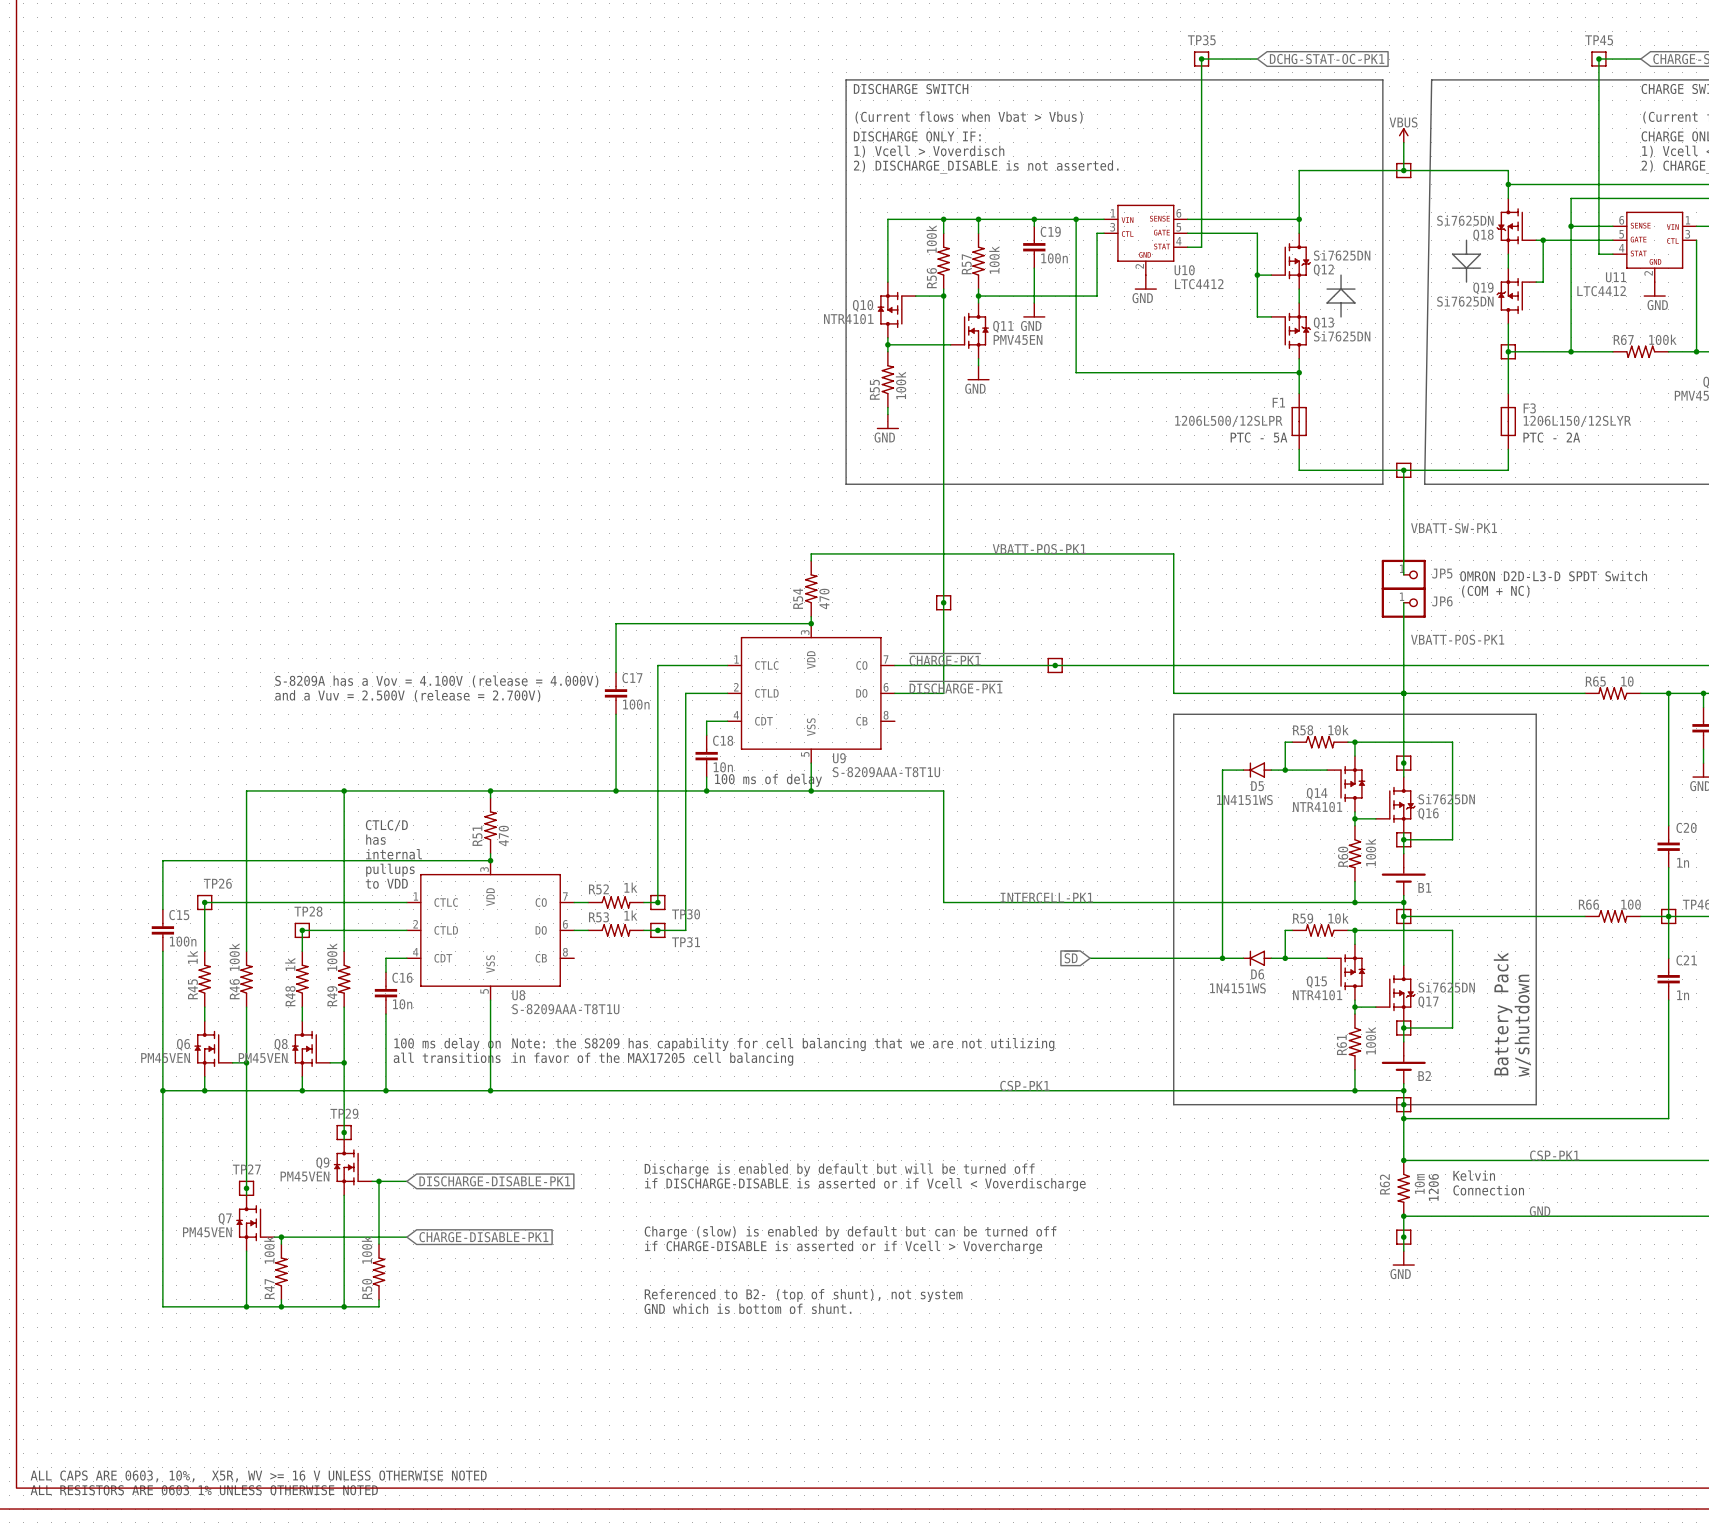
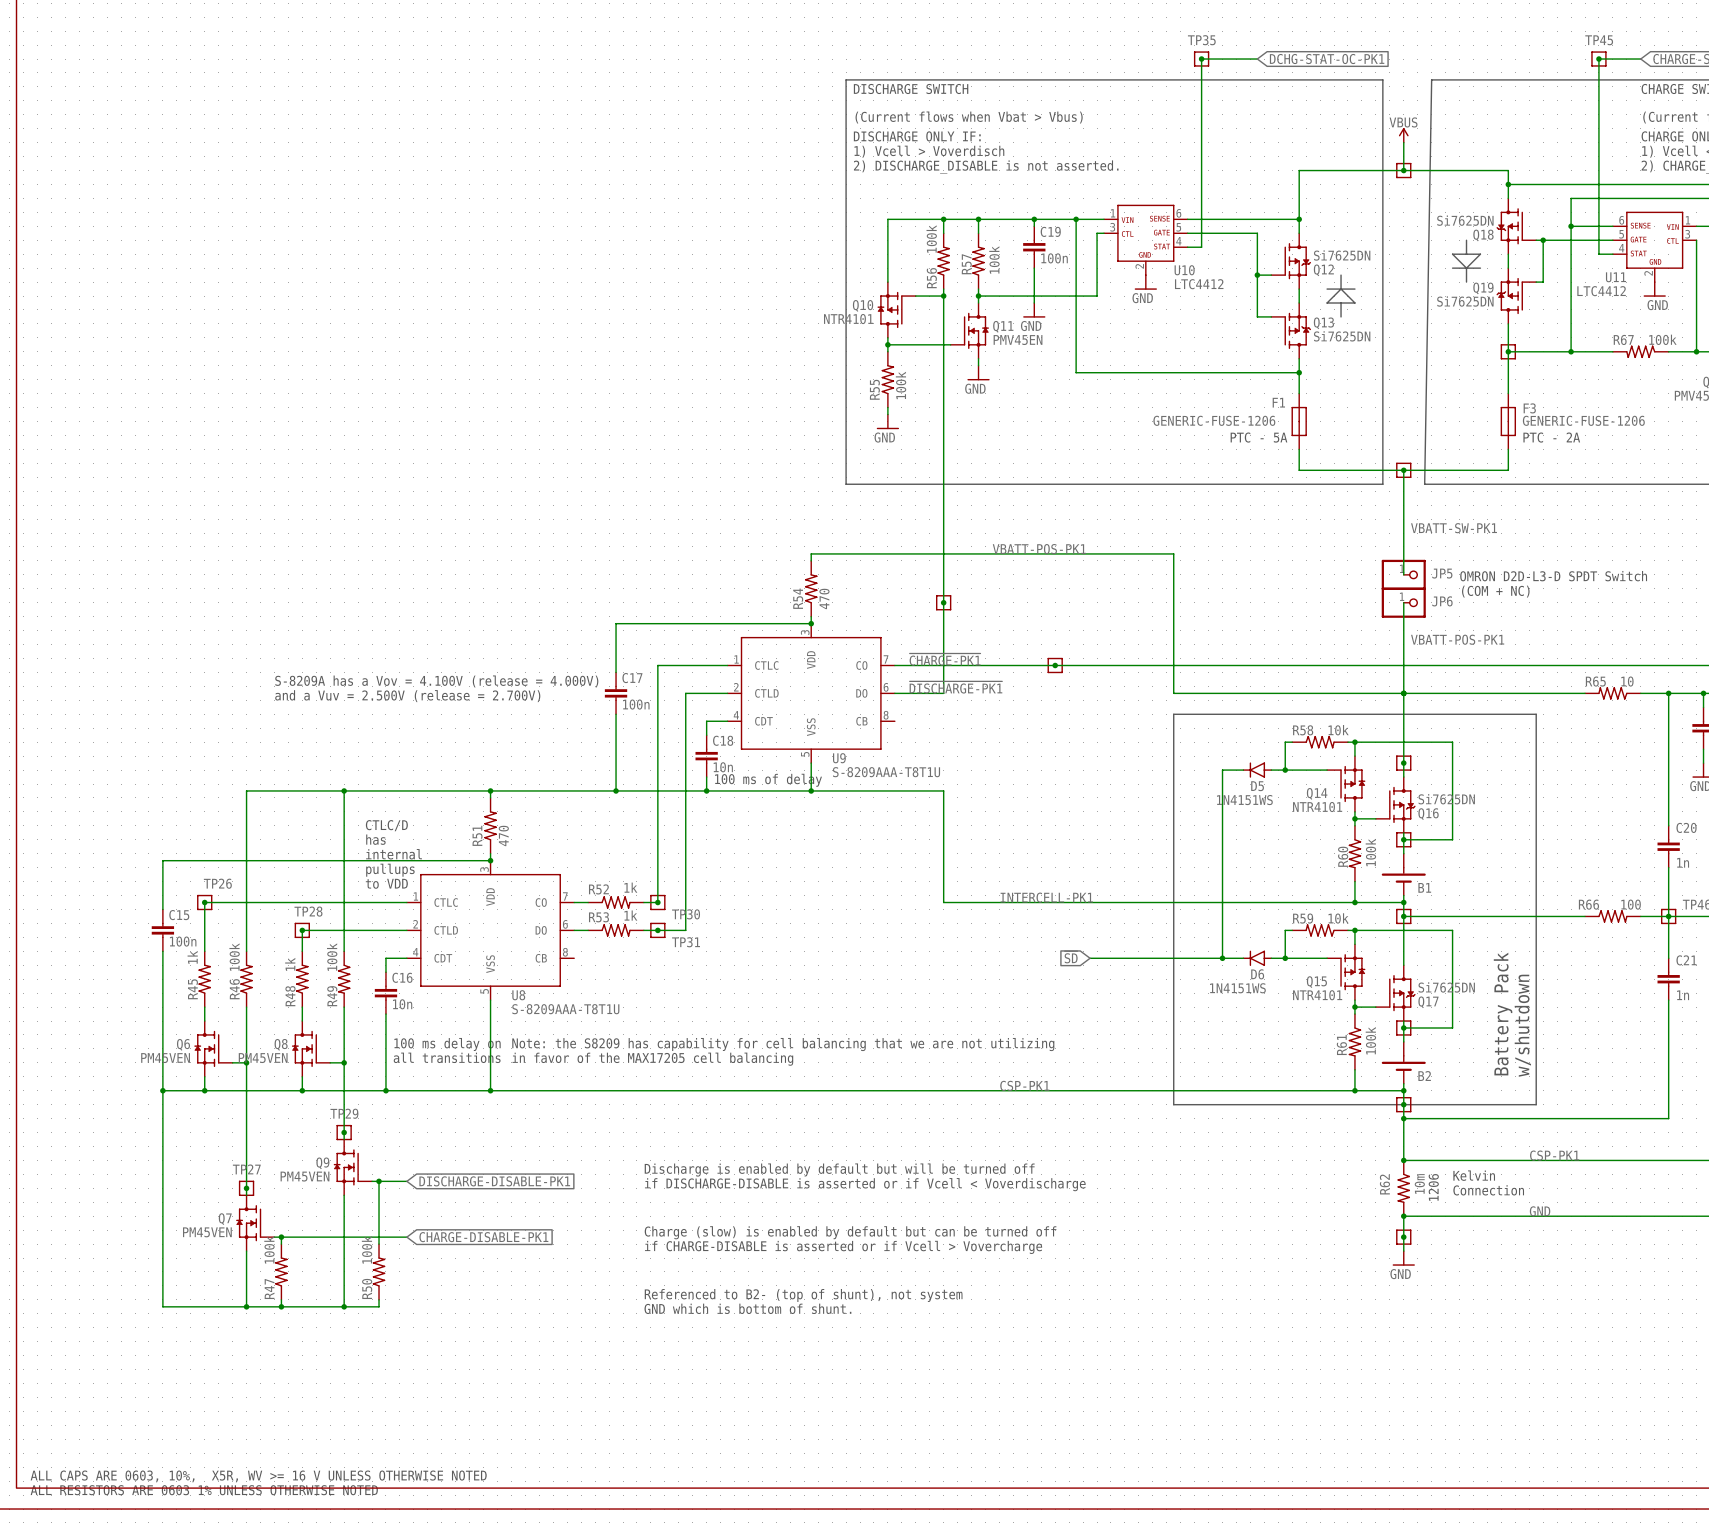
F1 value: 1206L500/12SLPR (1228, 421) -> GENERIC-FUSE-1206 (1214, 420)
F3 value: 1206L150/12SLYR (1577, 421) -> GENERIC-FUSE-1206 (1583, 420)

